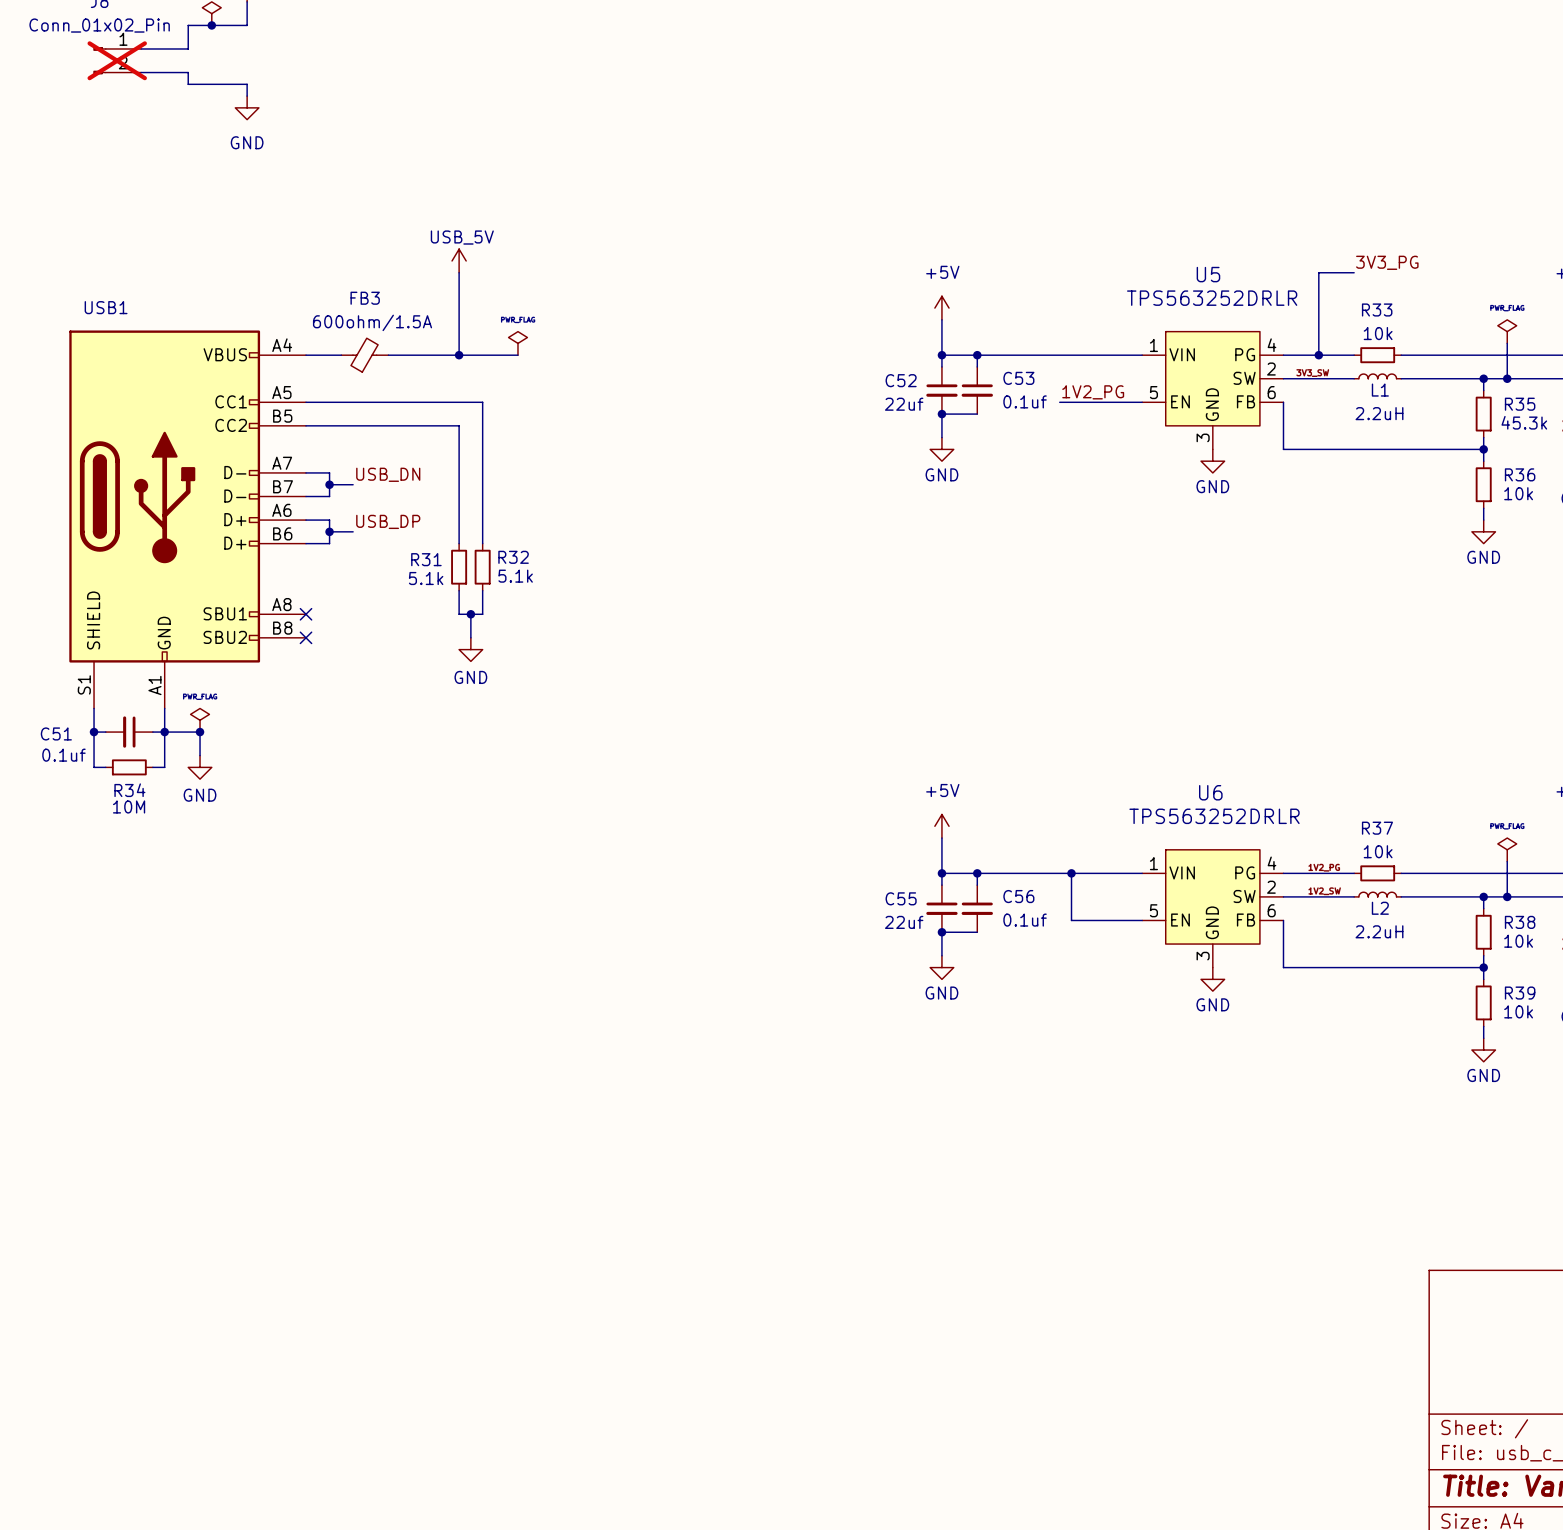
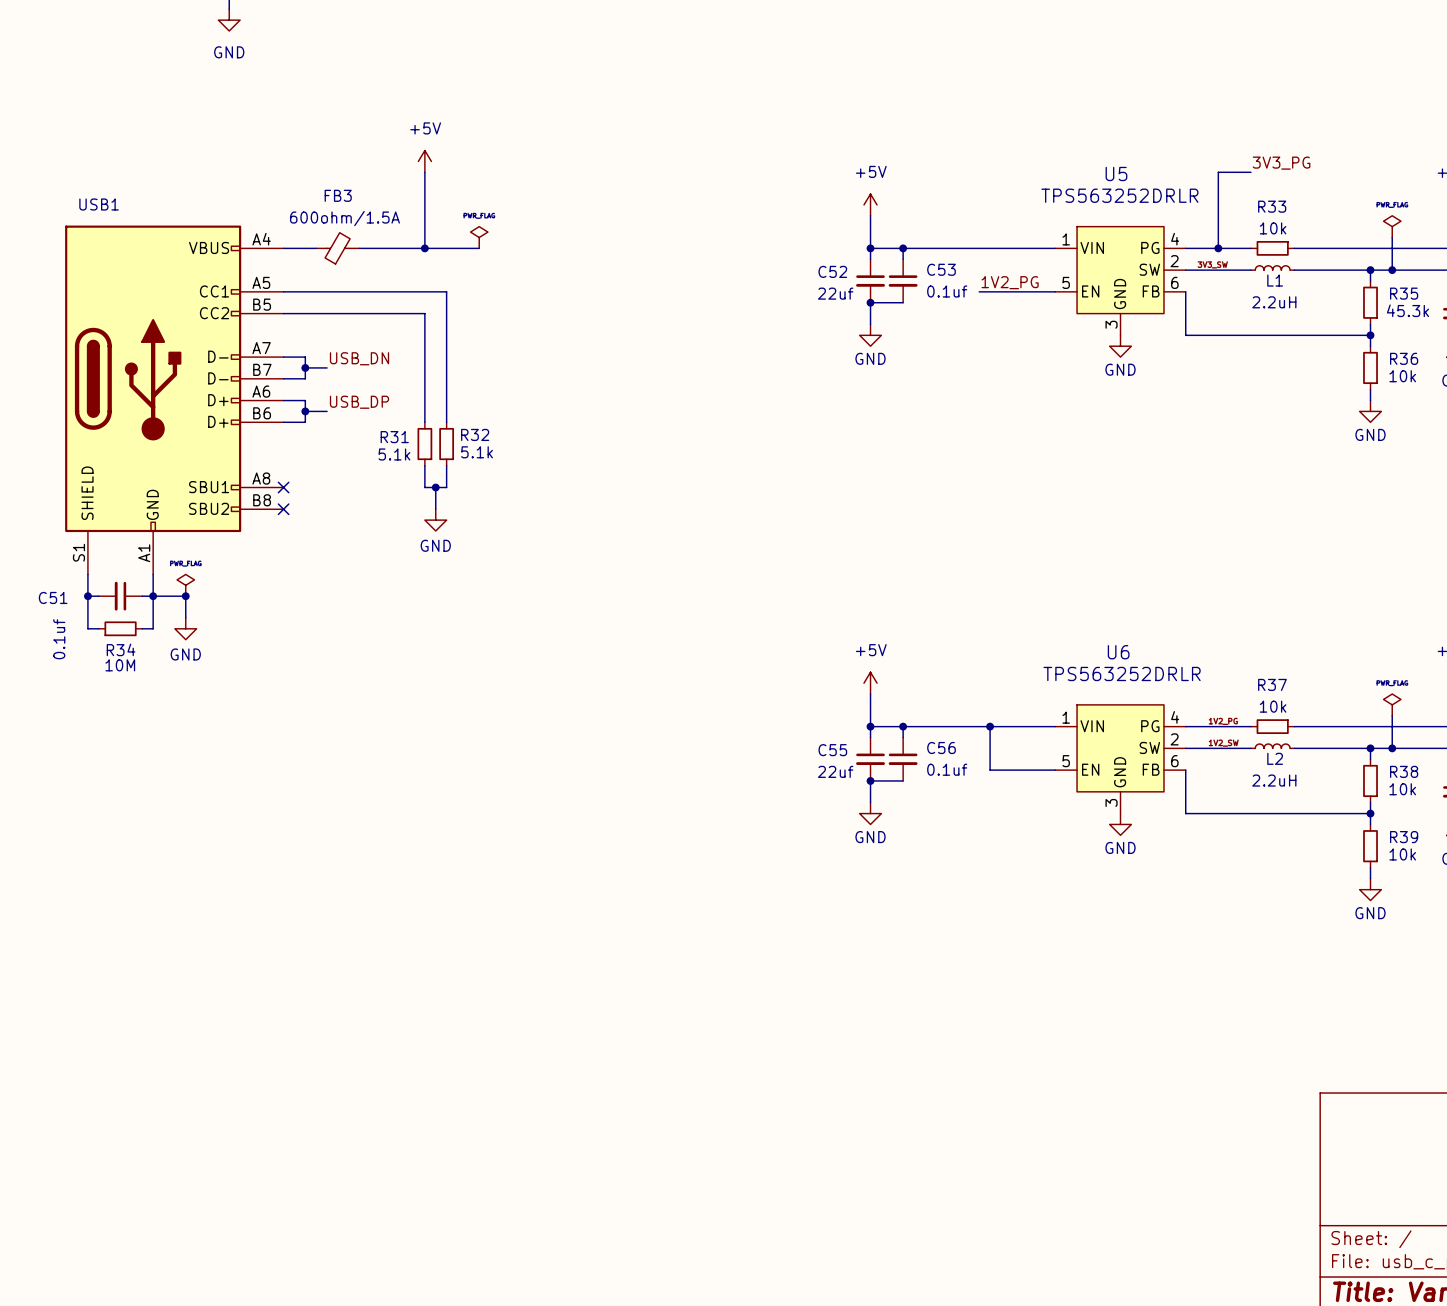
power symbol: USB_5V (459, 260) -> +5V (424, 161)
C51 value rotation: 0° (63, 755) -> 90° counterclockwise (59, 639)

